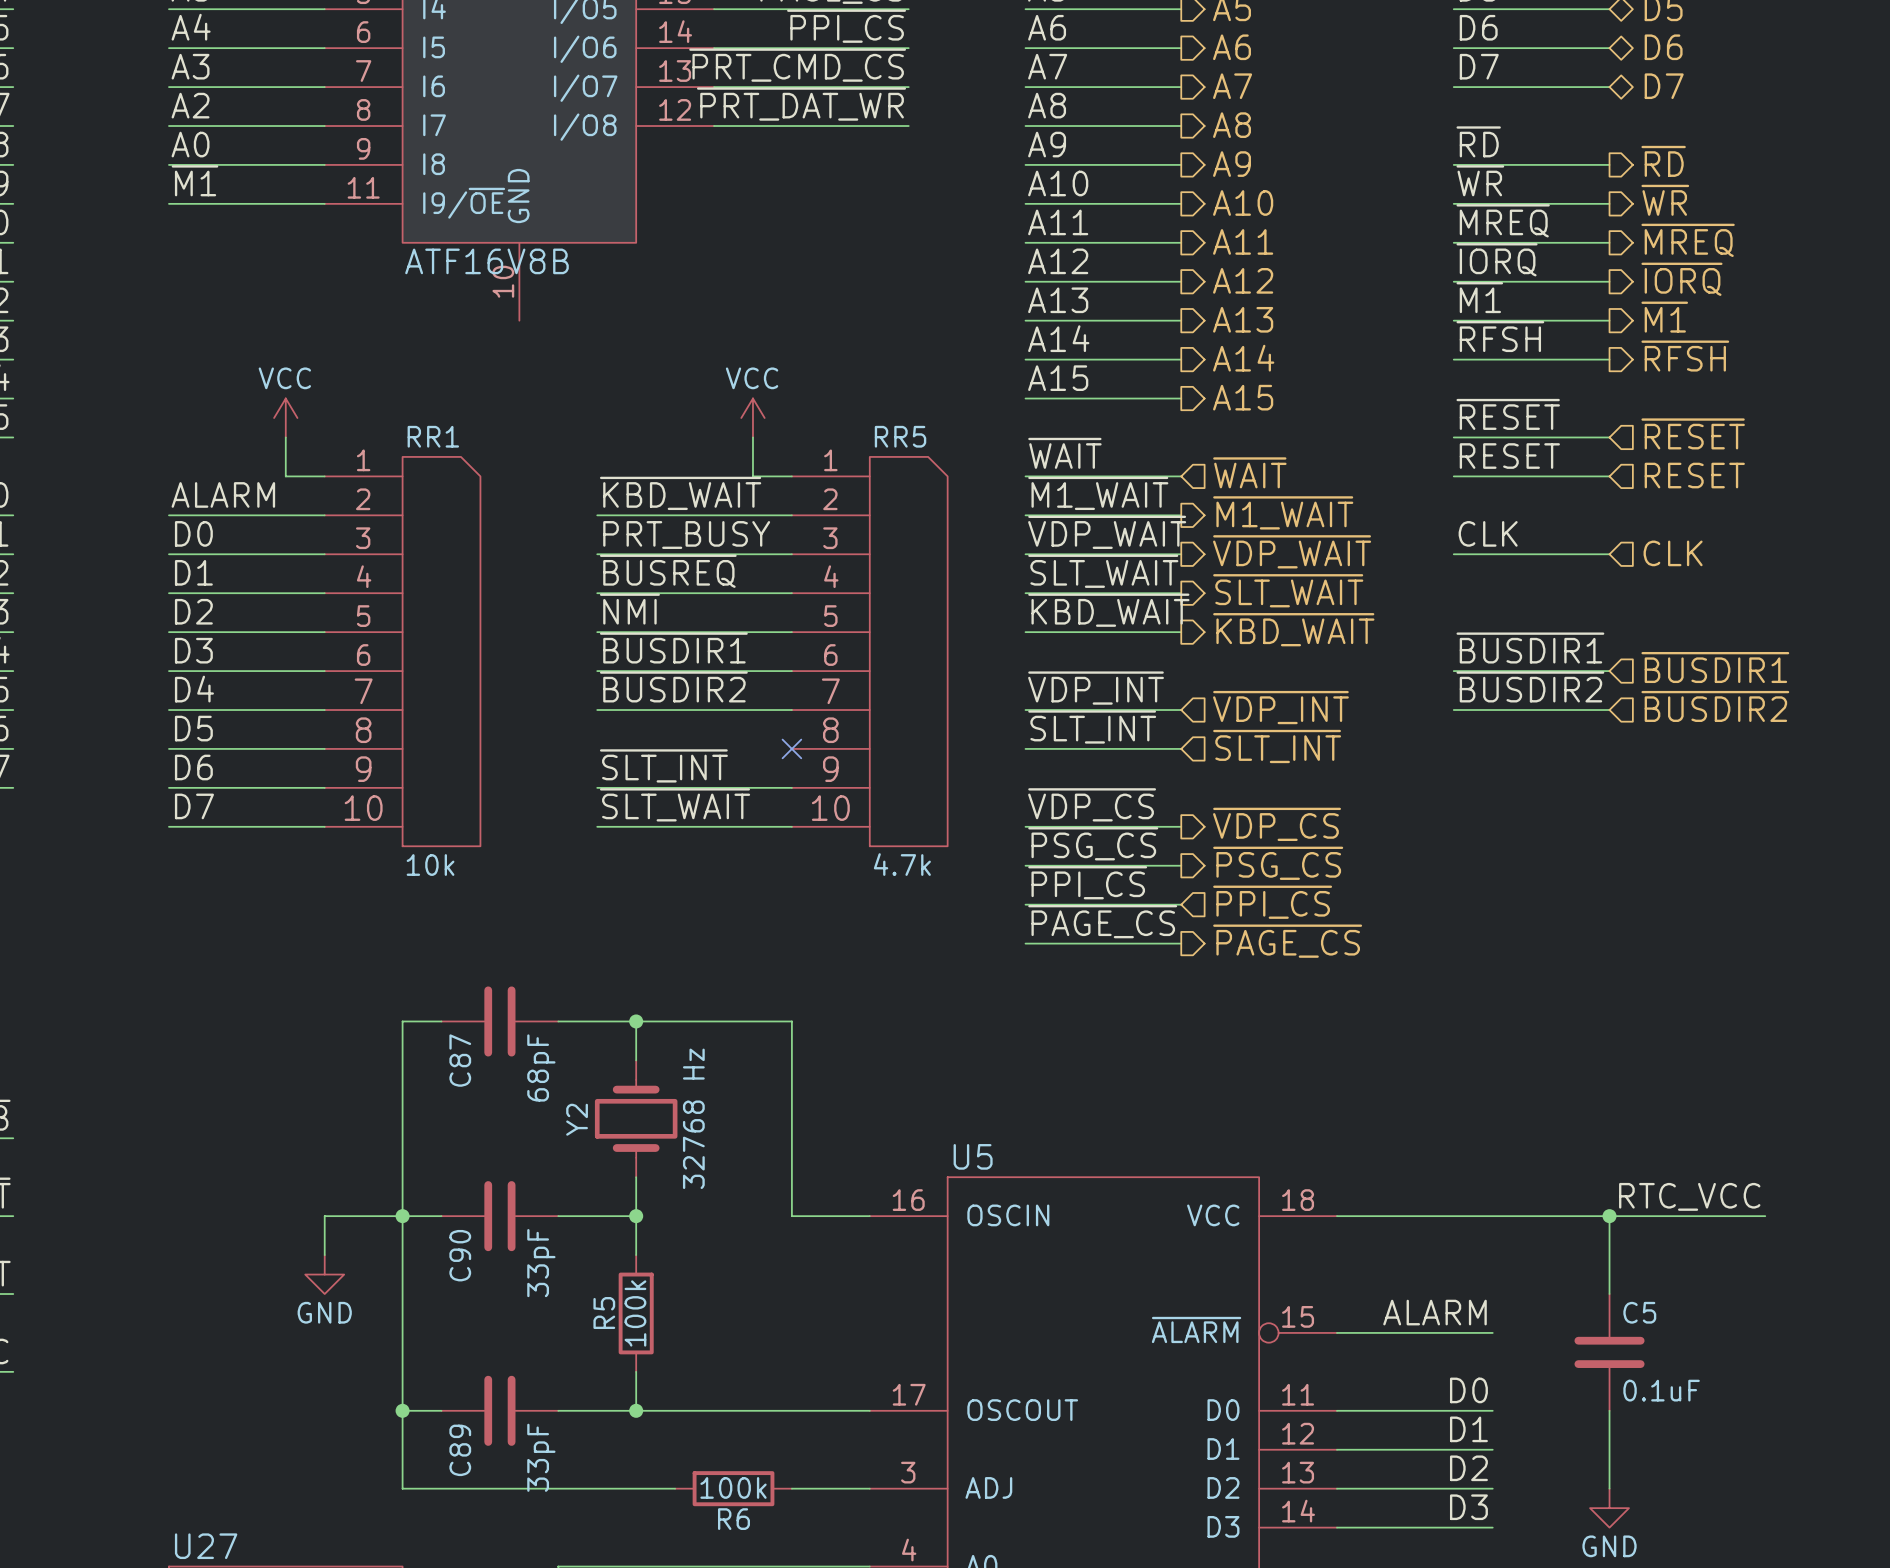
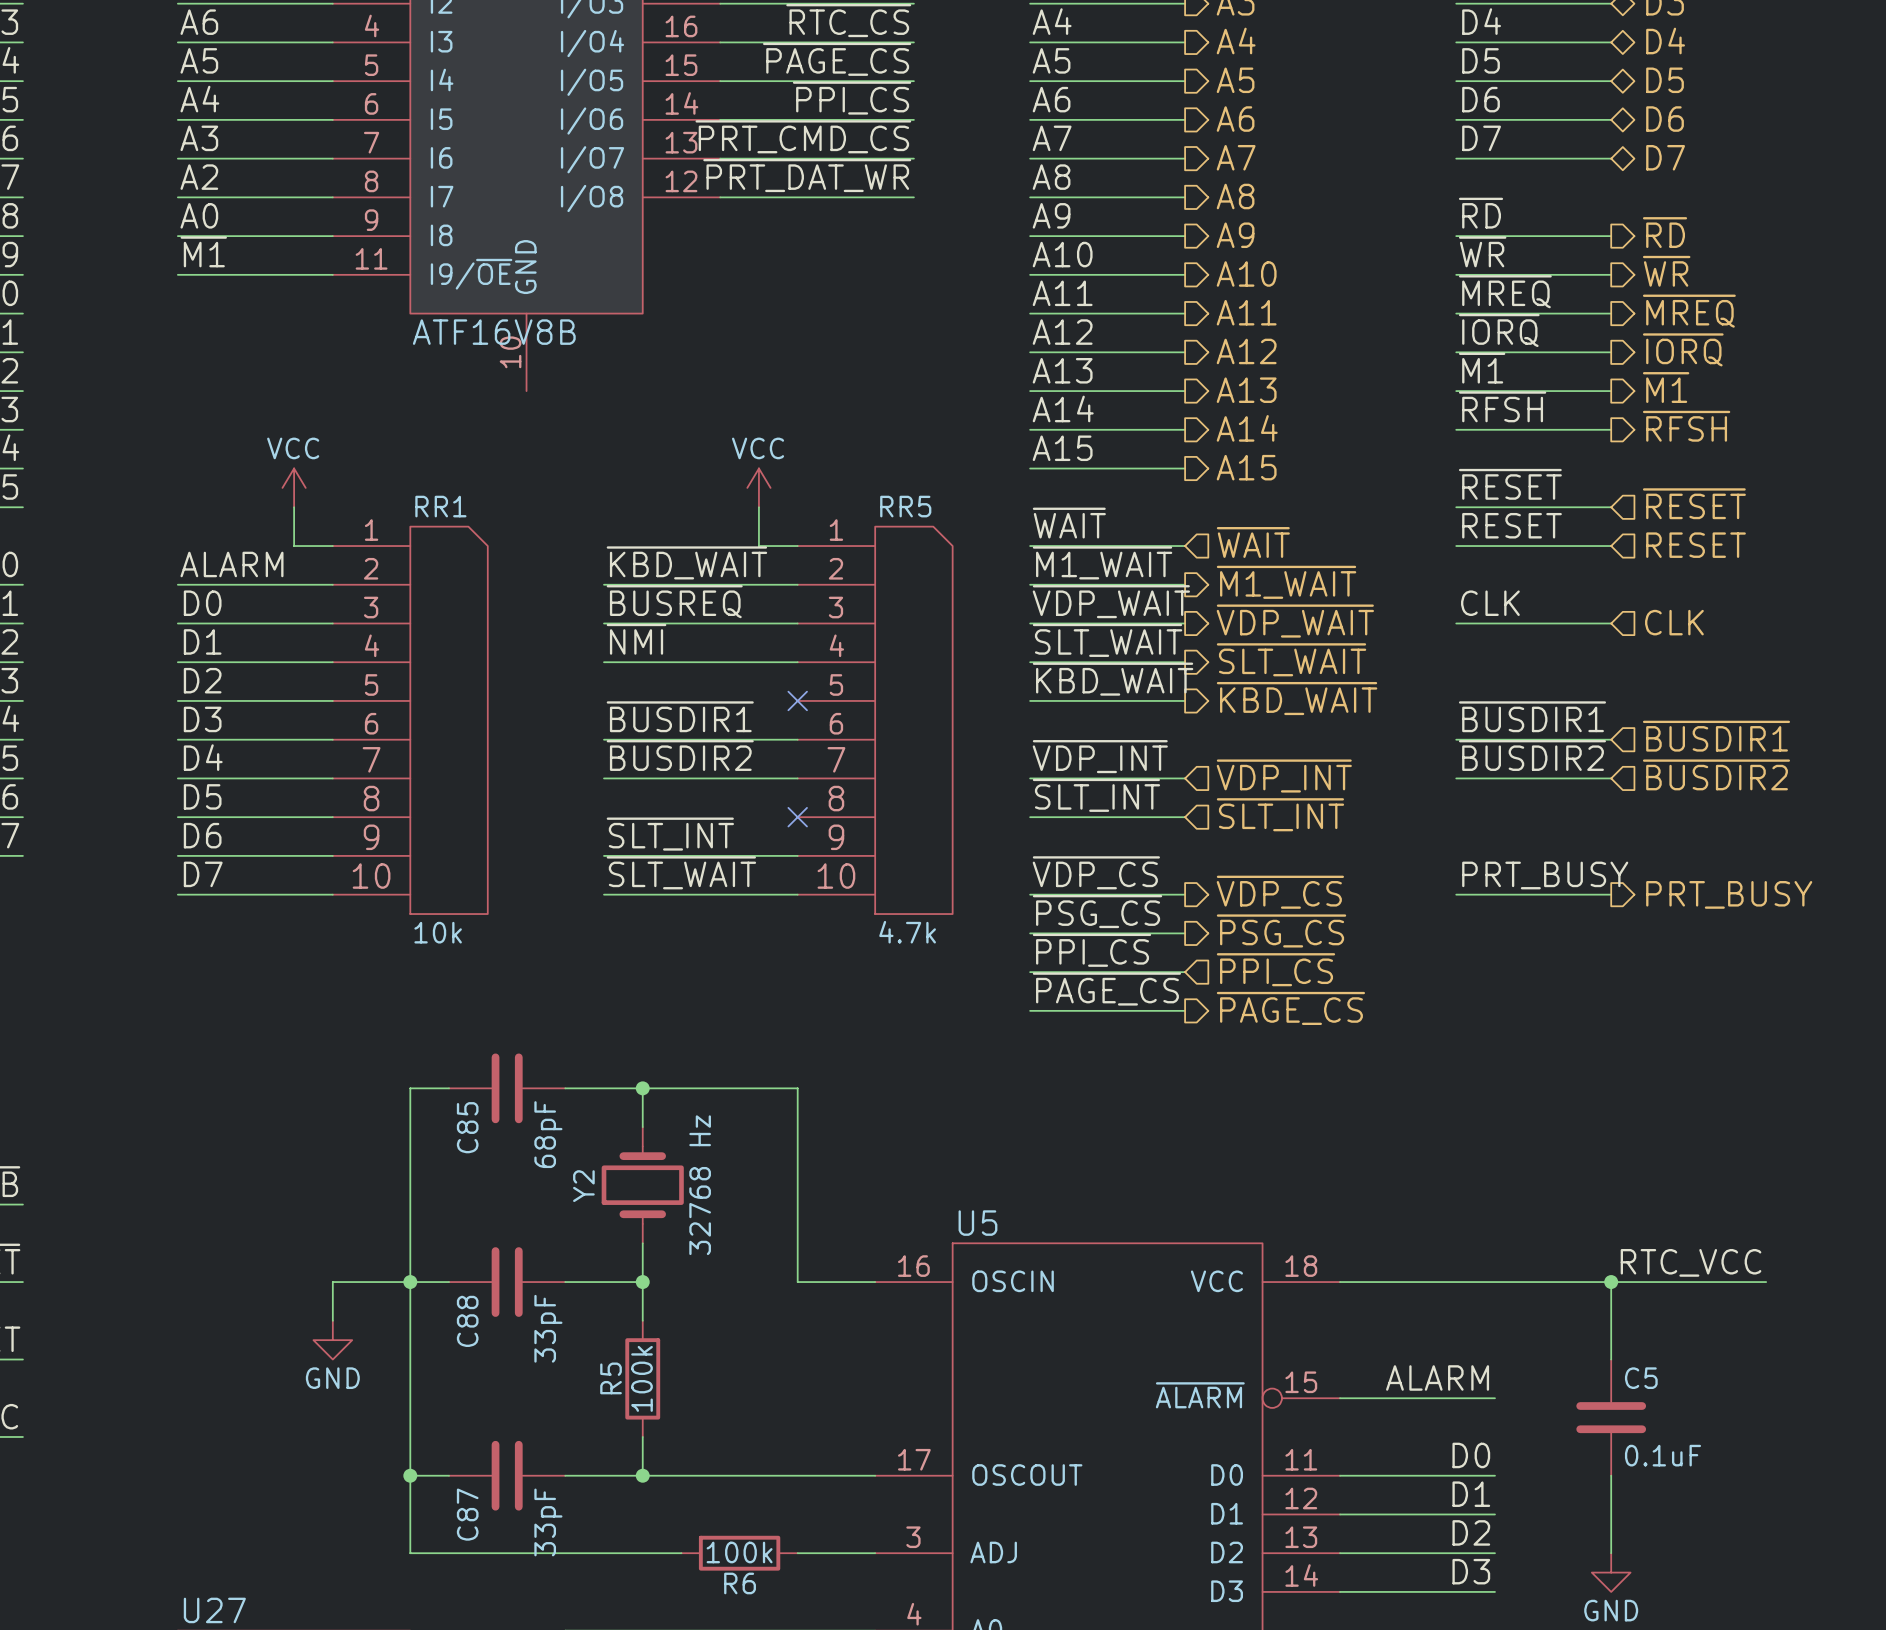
label: PRT_BUSY (686, 535) -> ~{BUSREQ} (674, 601)
label: ~{BUSREQ} (668, 571) -> ~{NMI} (636, 639)
label: ~{NMI} (629, 609) -> none
wire: (597, 632) (791, 632) -> none
no-connect mark: none -> (797, 700)
label: none -> PRT_BUSY (1545, 875)
wire: none -> (1456, 894) (1611, 894)
hierarchical label: none -> PRT_BUSY (1729, 894)
C87 name: C87 (460, 1060) -> C85 (467, 1127)
C90 name: C90 (460, 1255) -> C88 (467, 1321)
C89 name: C89 (460, 1450) -> C87 (467, 1514)

